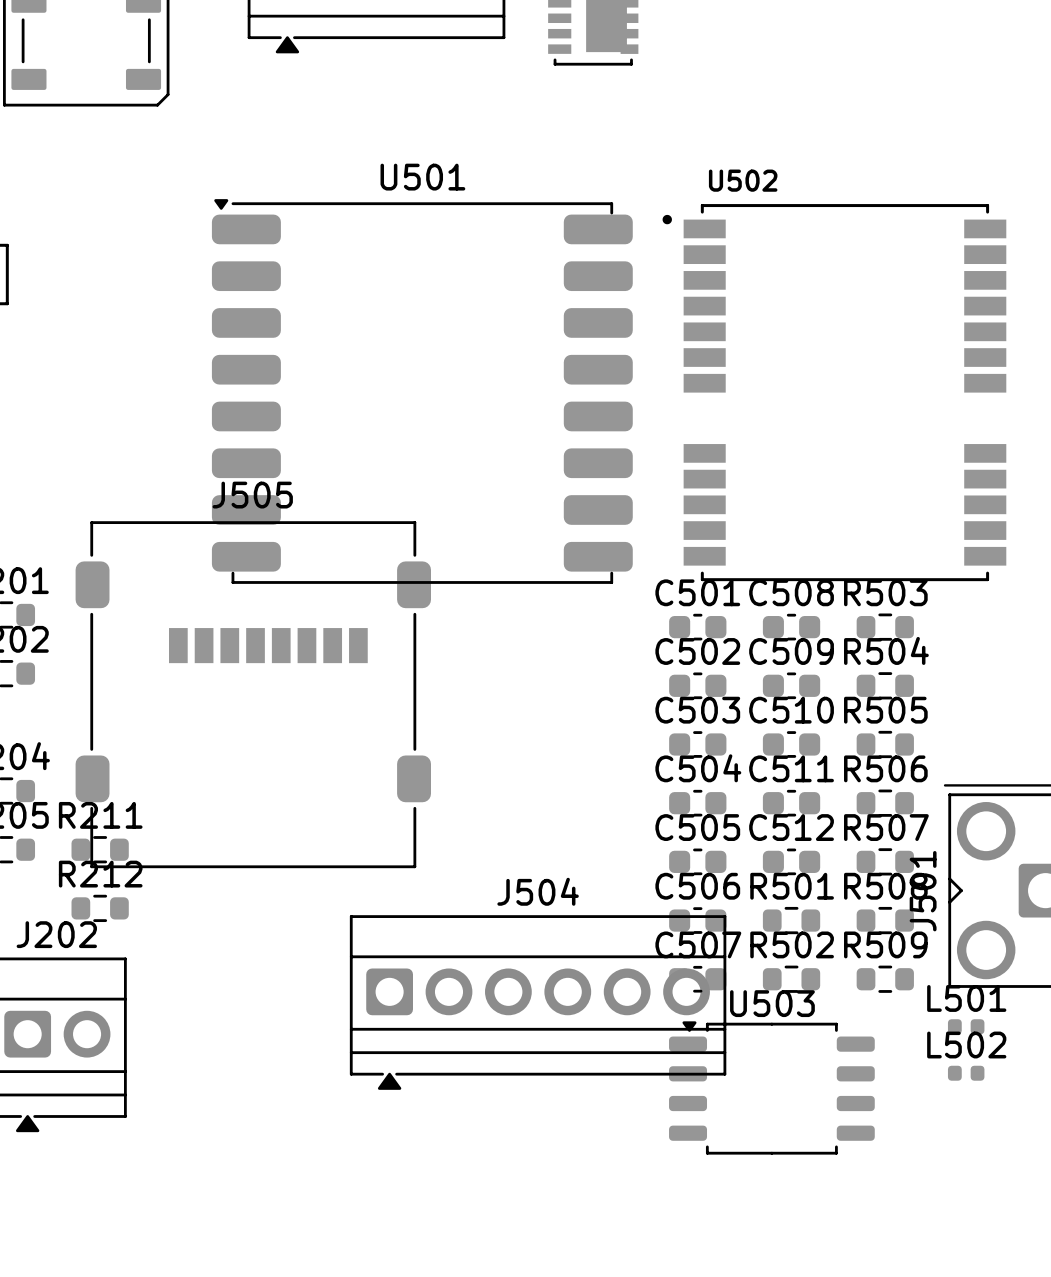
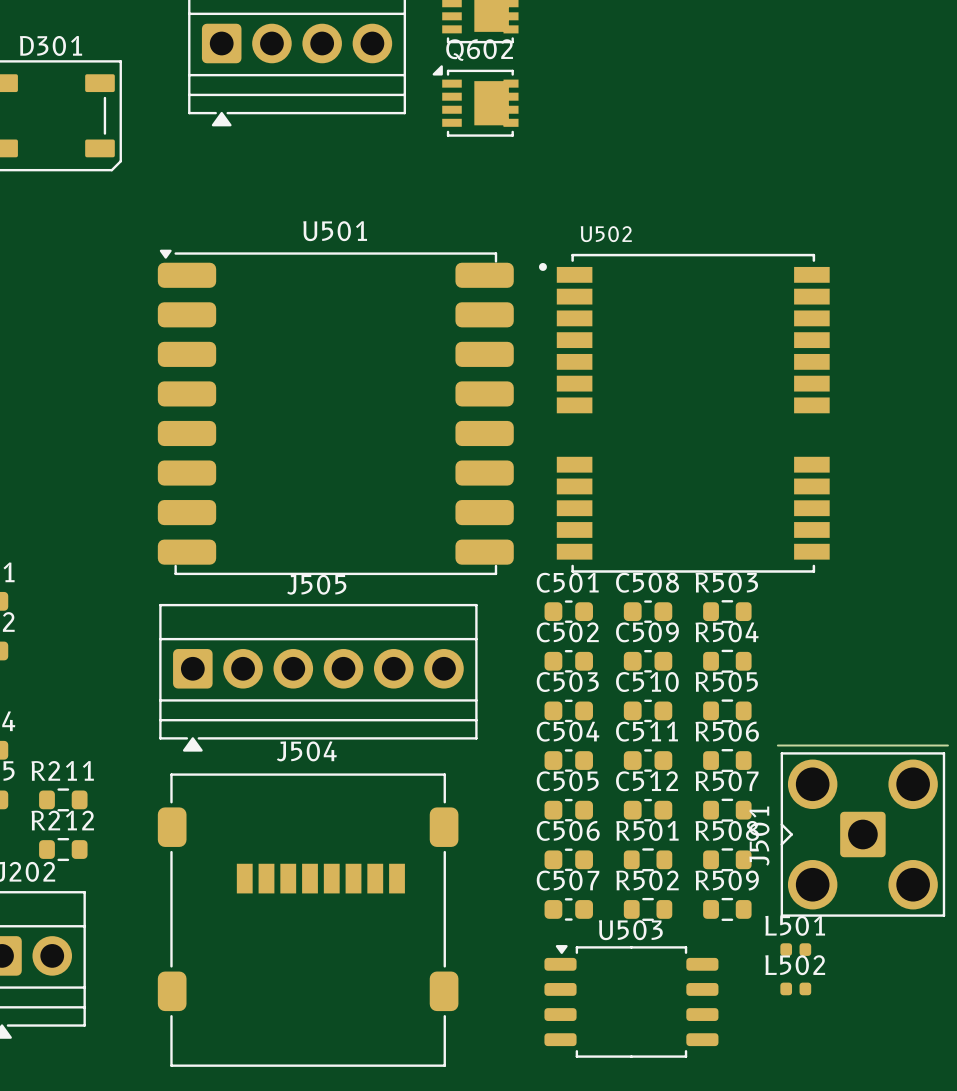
J505 name position: J505 (252, 495) -> J505 (316, 584)
J505 footprint: [75, 521, 431, 869] -> [159, 603, 478, 752]
J504 name position: J504 (538, 891) -> J504 (306, 751)
J504 footprint: [349, 915, 727, 1090] -> [157, 773, 459, 1067]

